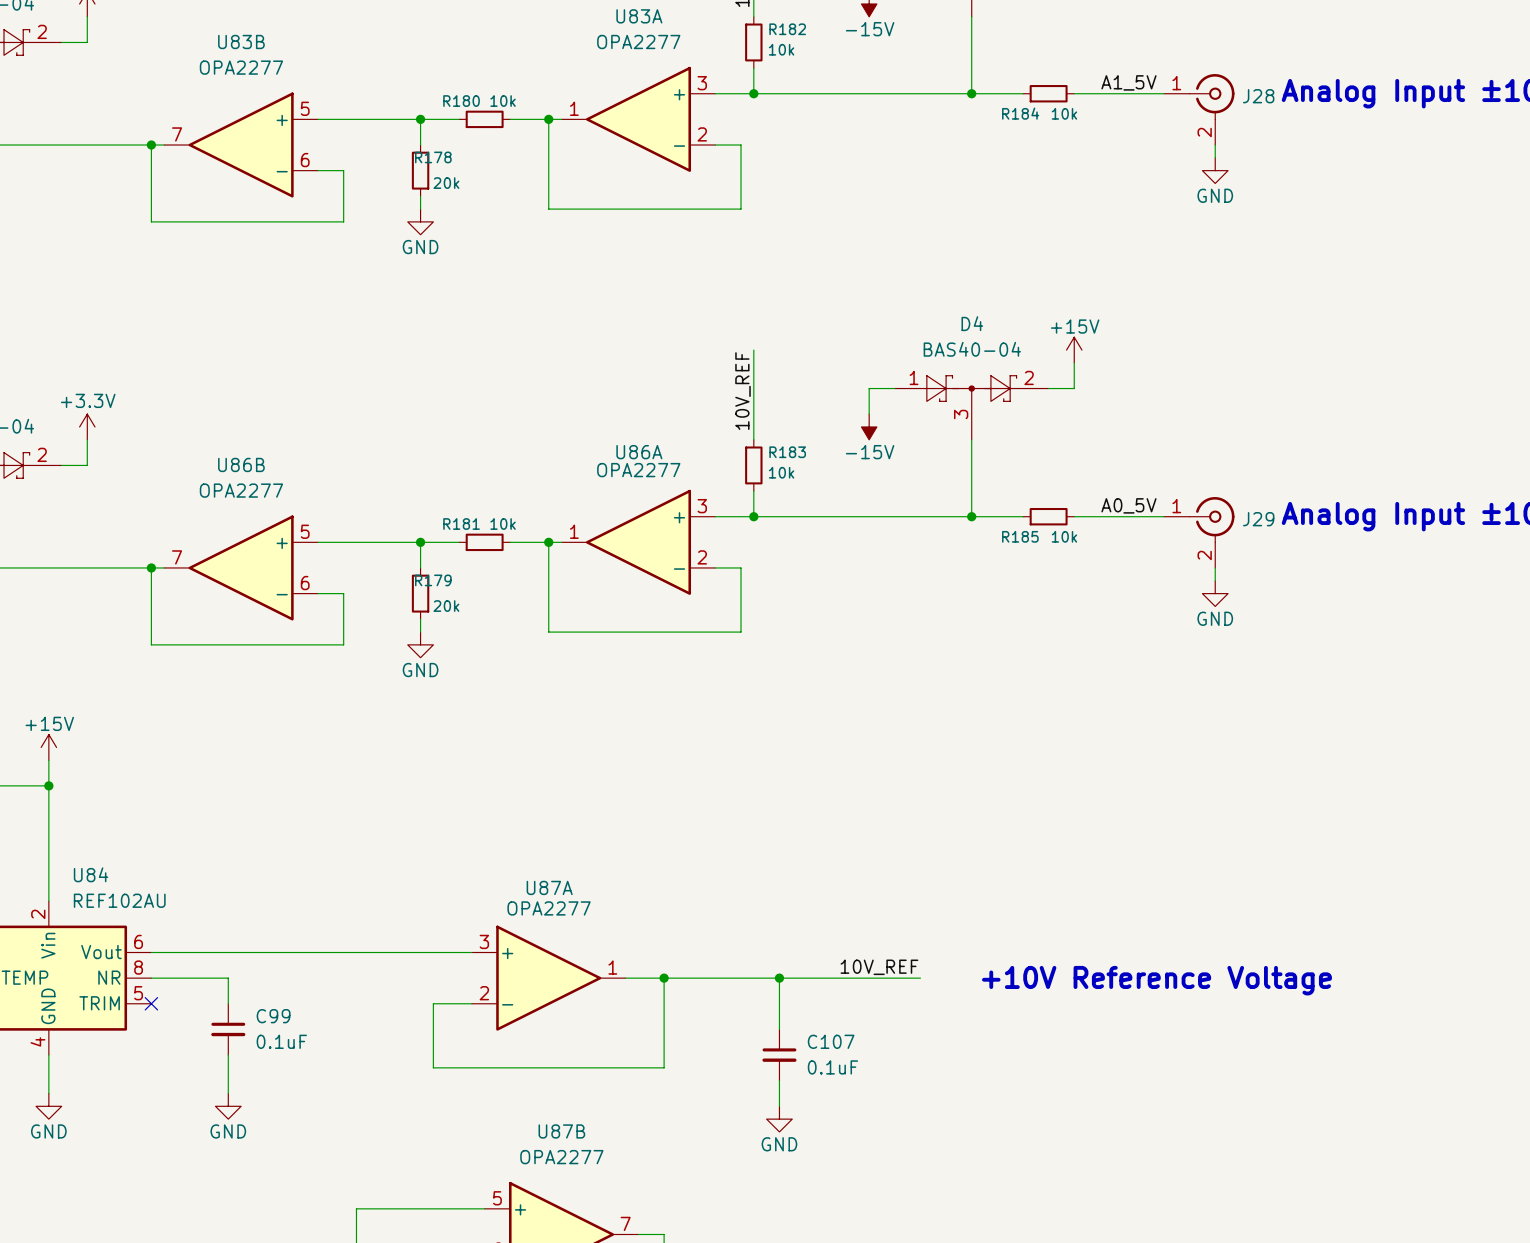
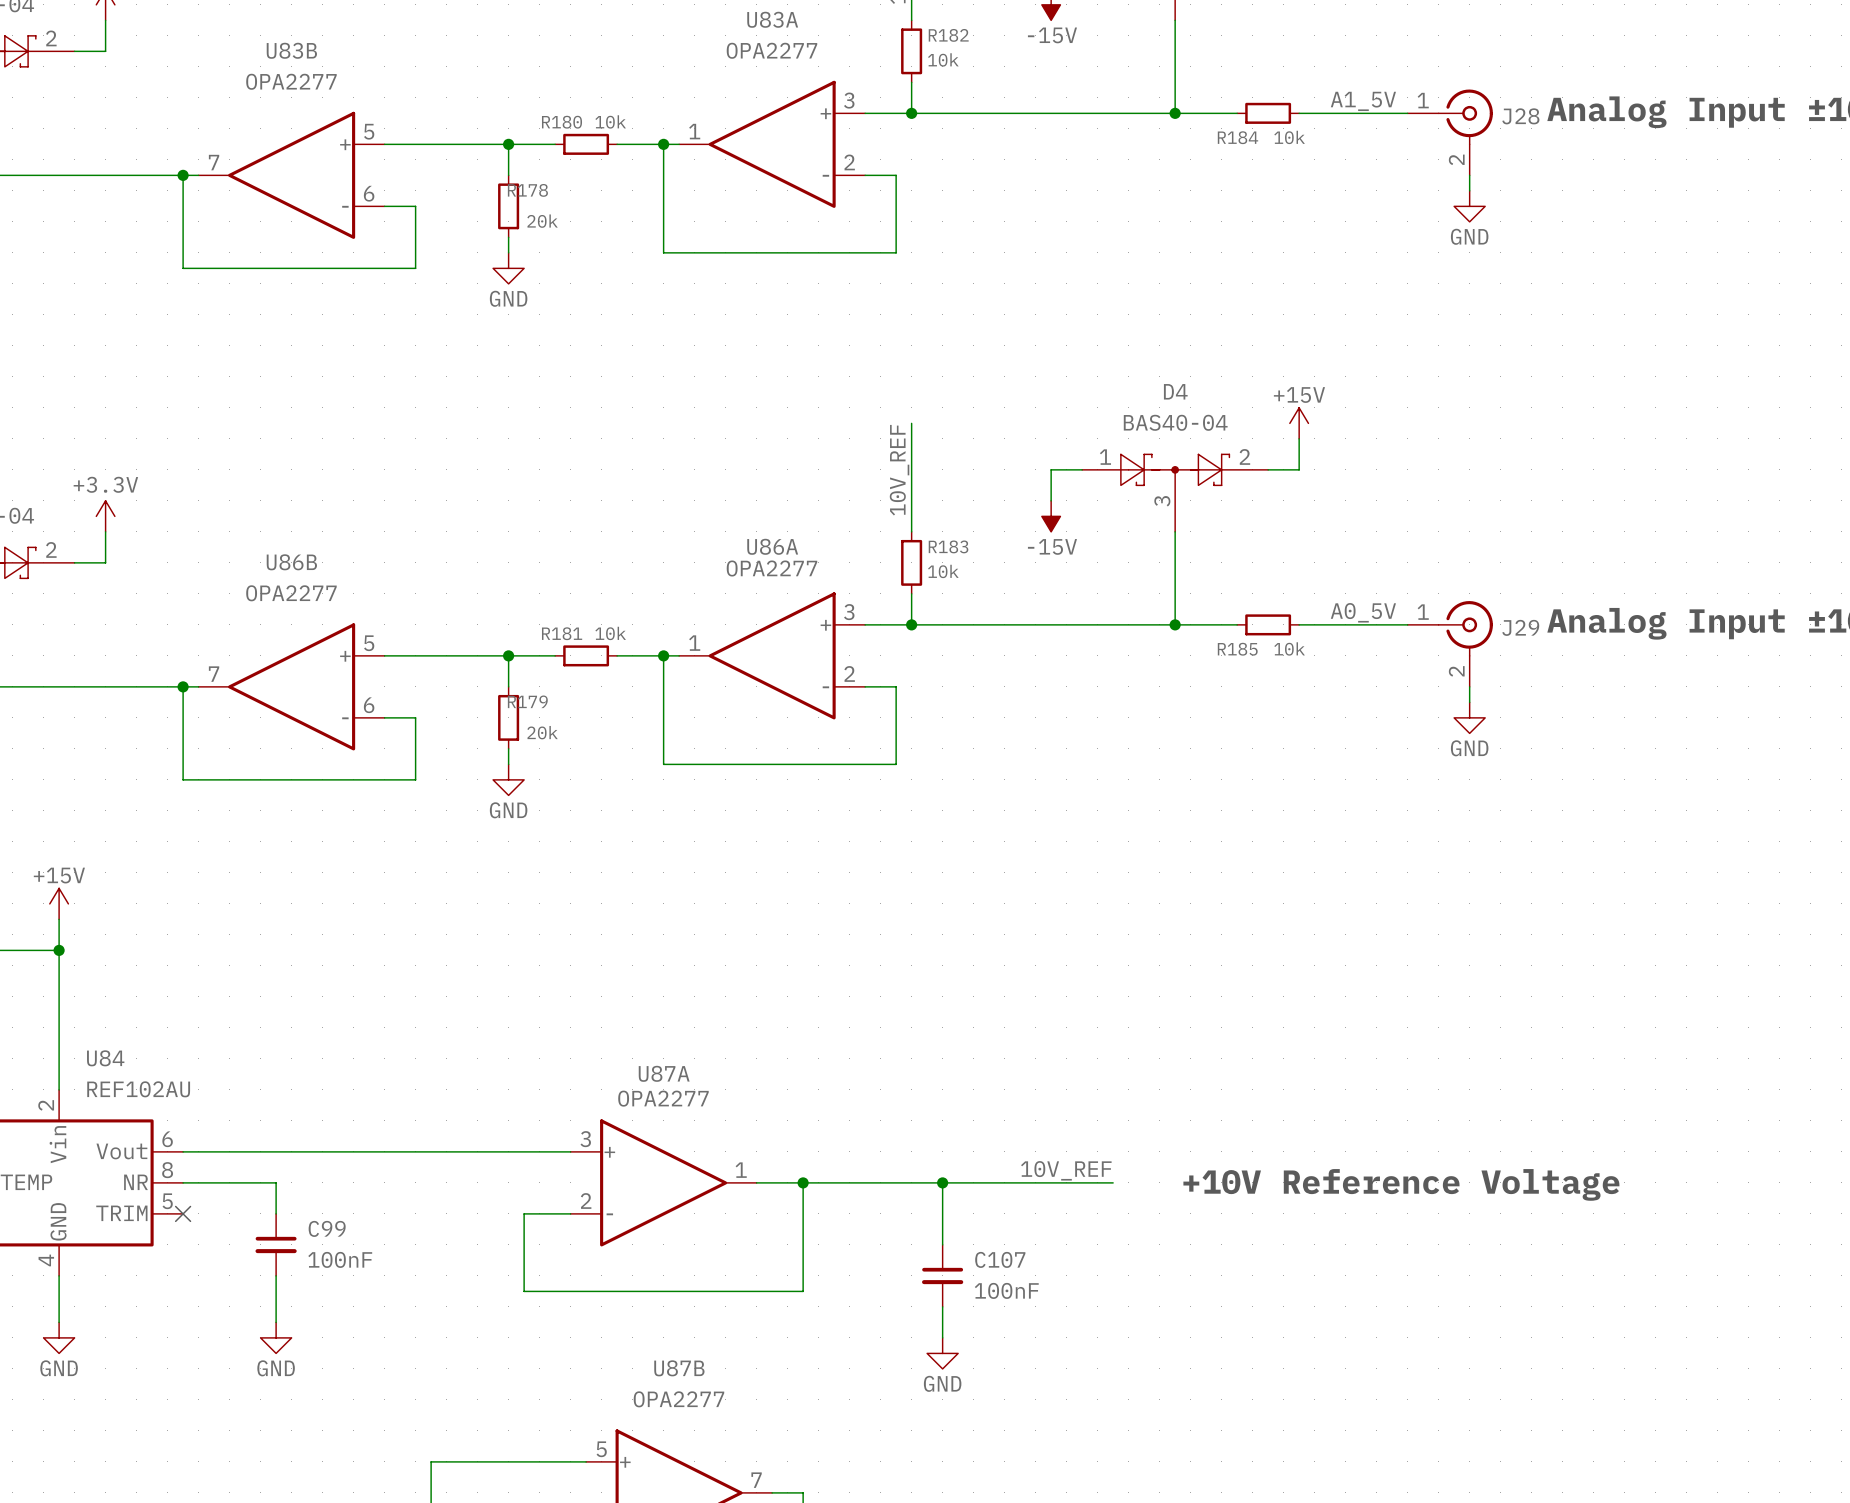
C99 value: 0.1uF (281, 1041) -> 100nF (340, 1259)
C107 value: 0.1uF (832, 1067) -> 100nF (1006, 1290)

